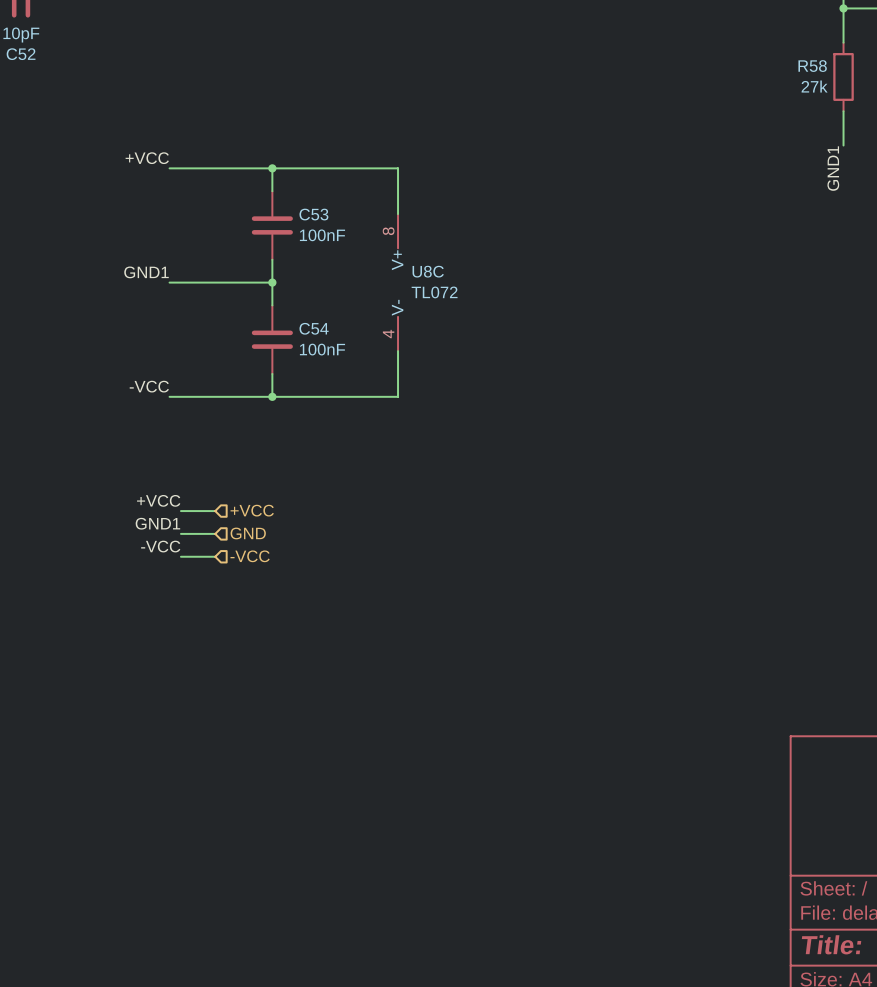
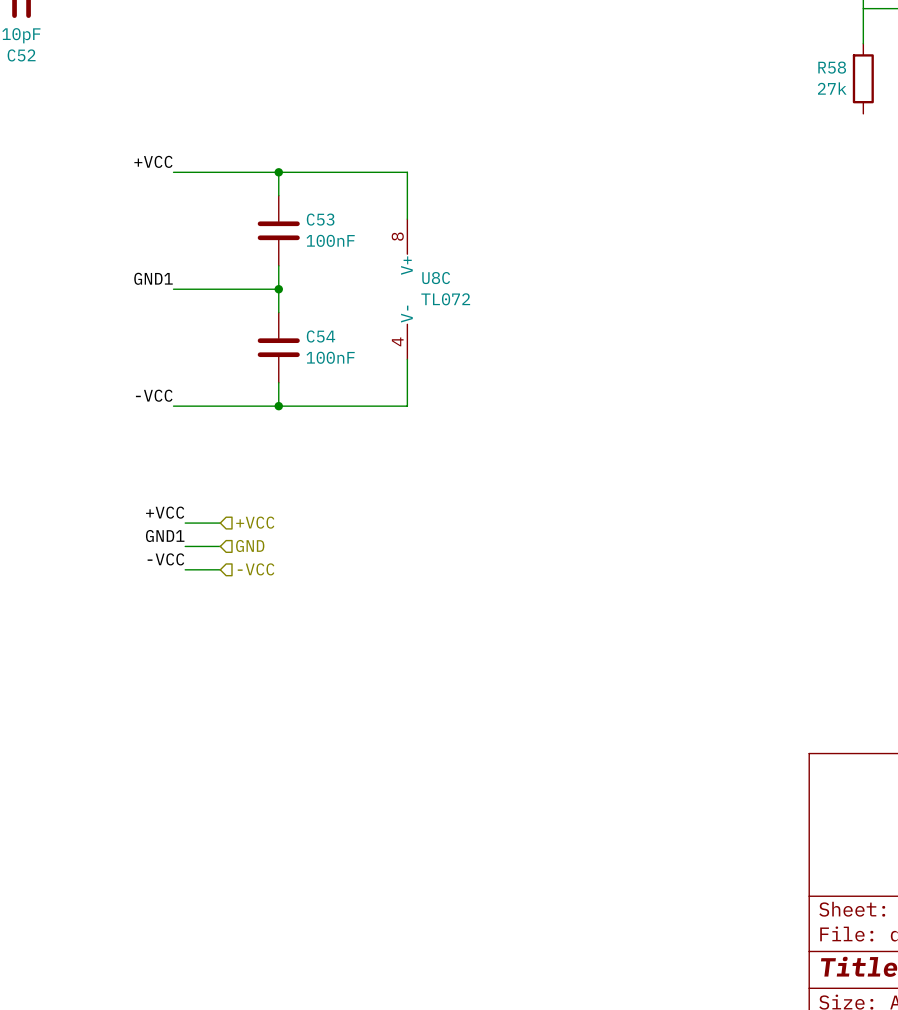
junction: (843, 8) -> none
wire: (843, 111) (843, 145) -> none
label: GND1 (833, 168) -> none

